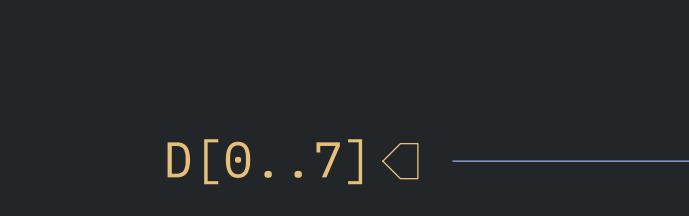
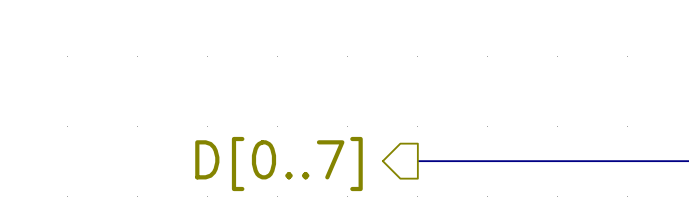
bus: none -> (417, 161) (452, 161)

